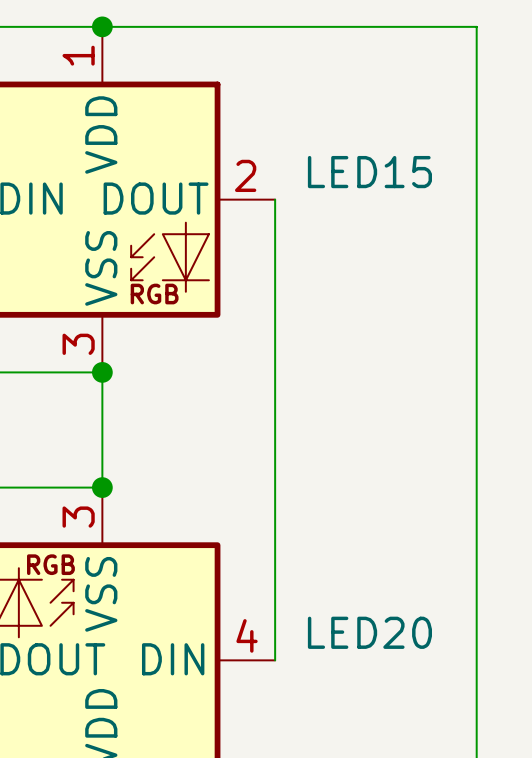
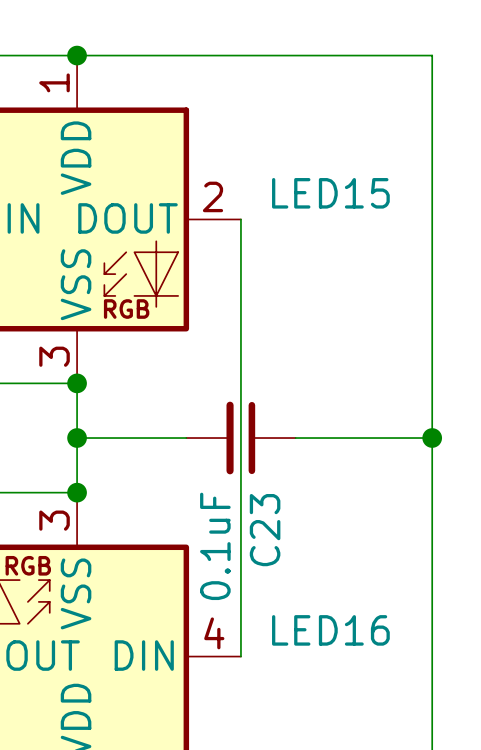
wire: none -> (77, 438) (186, 438)
junction: none -> (77, 438)
C23: none -> 0.1uF (240, 438)
wire: none -> (295, 438) (432, 438)
junction: none -> (432, 438)
LED20 name: LED20 (369, 632) -> LED16 (330, 630)

